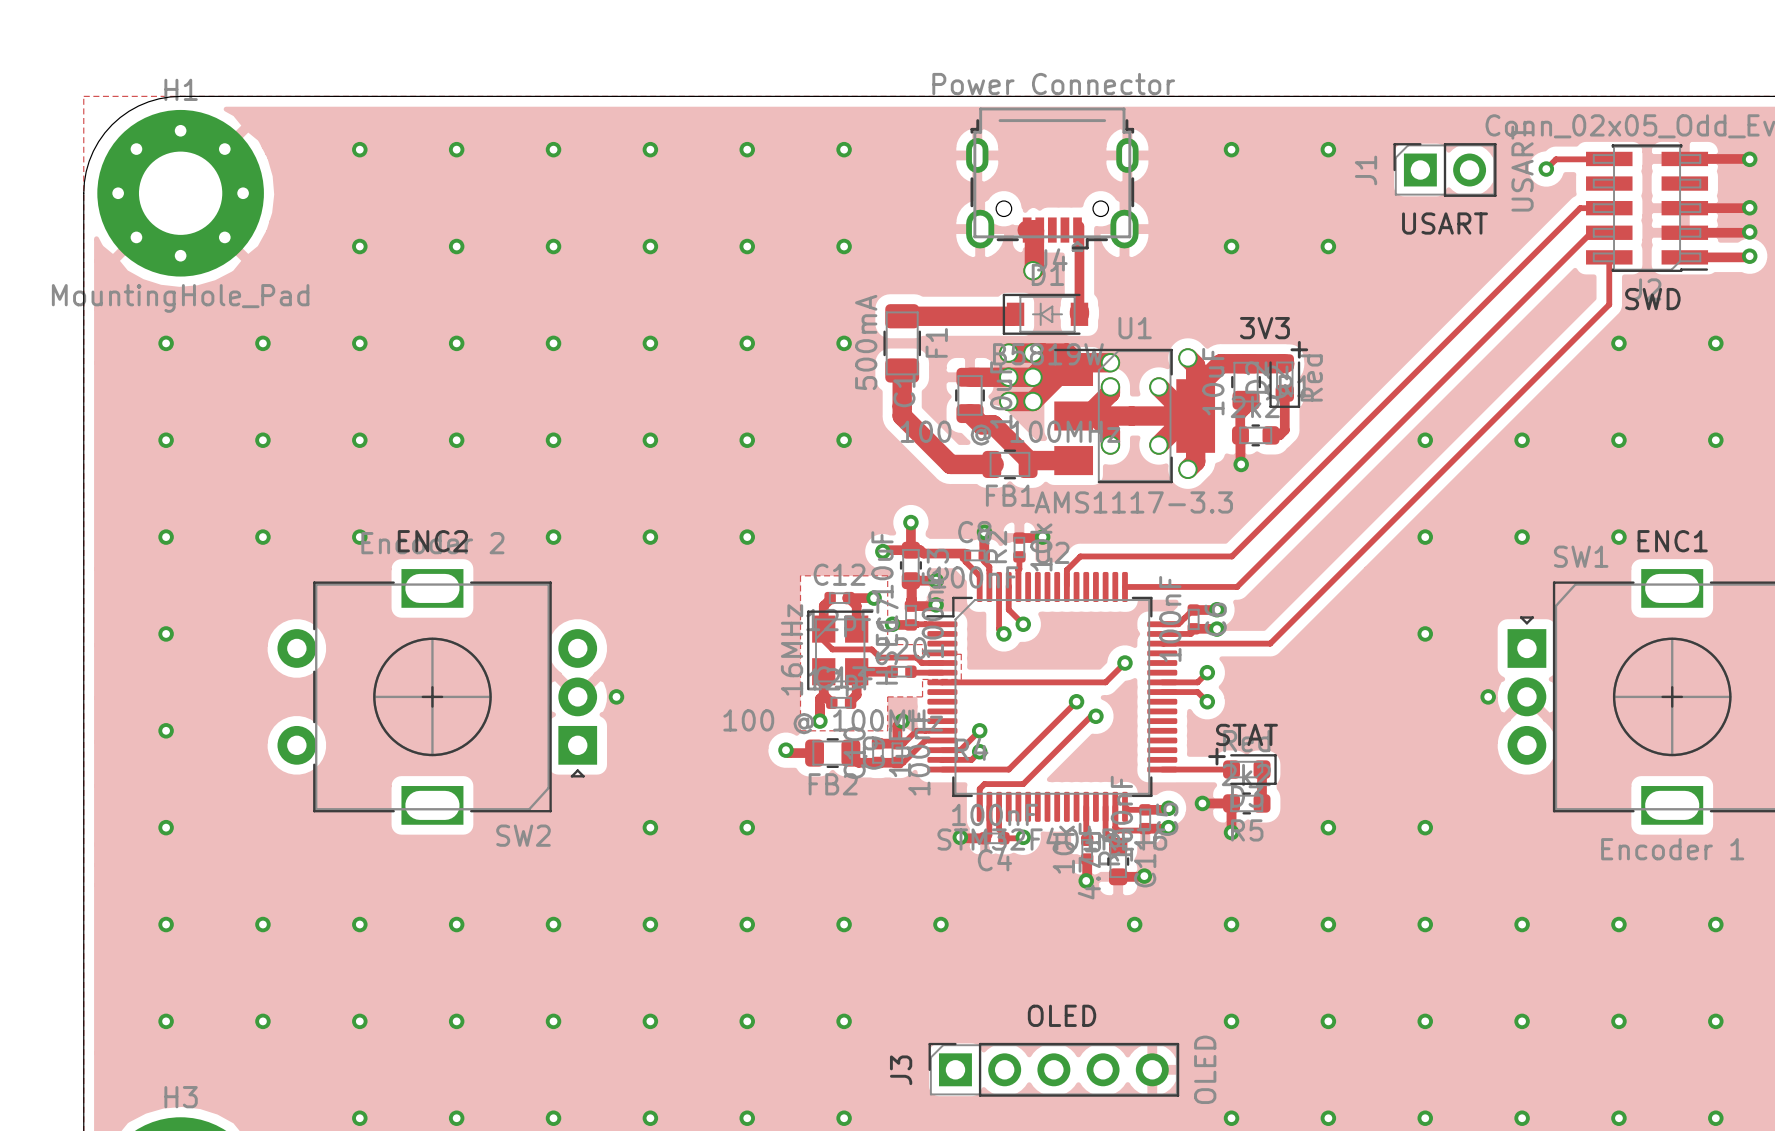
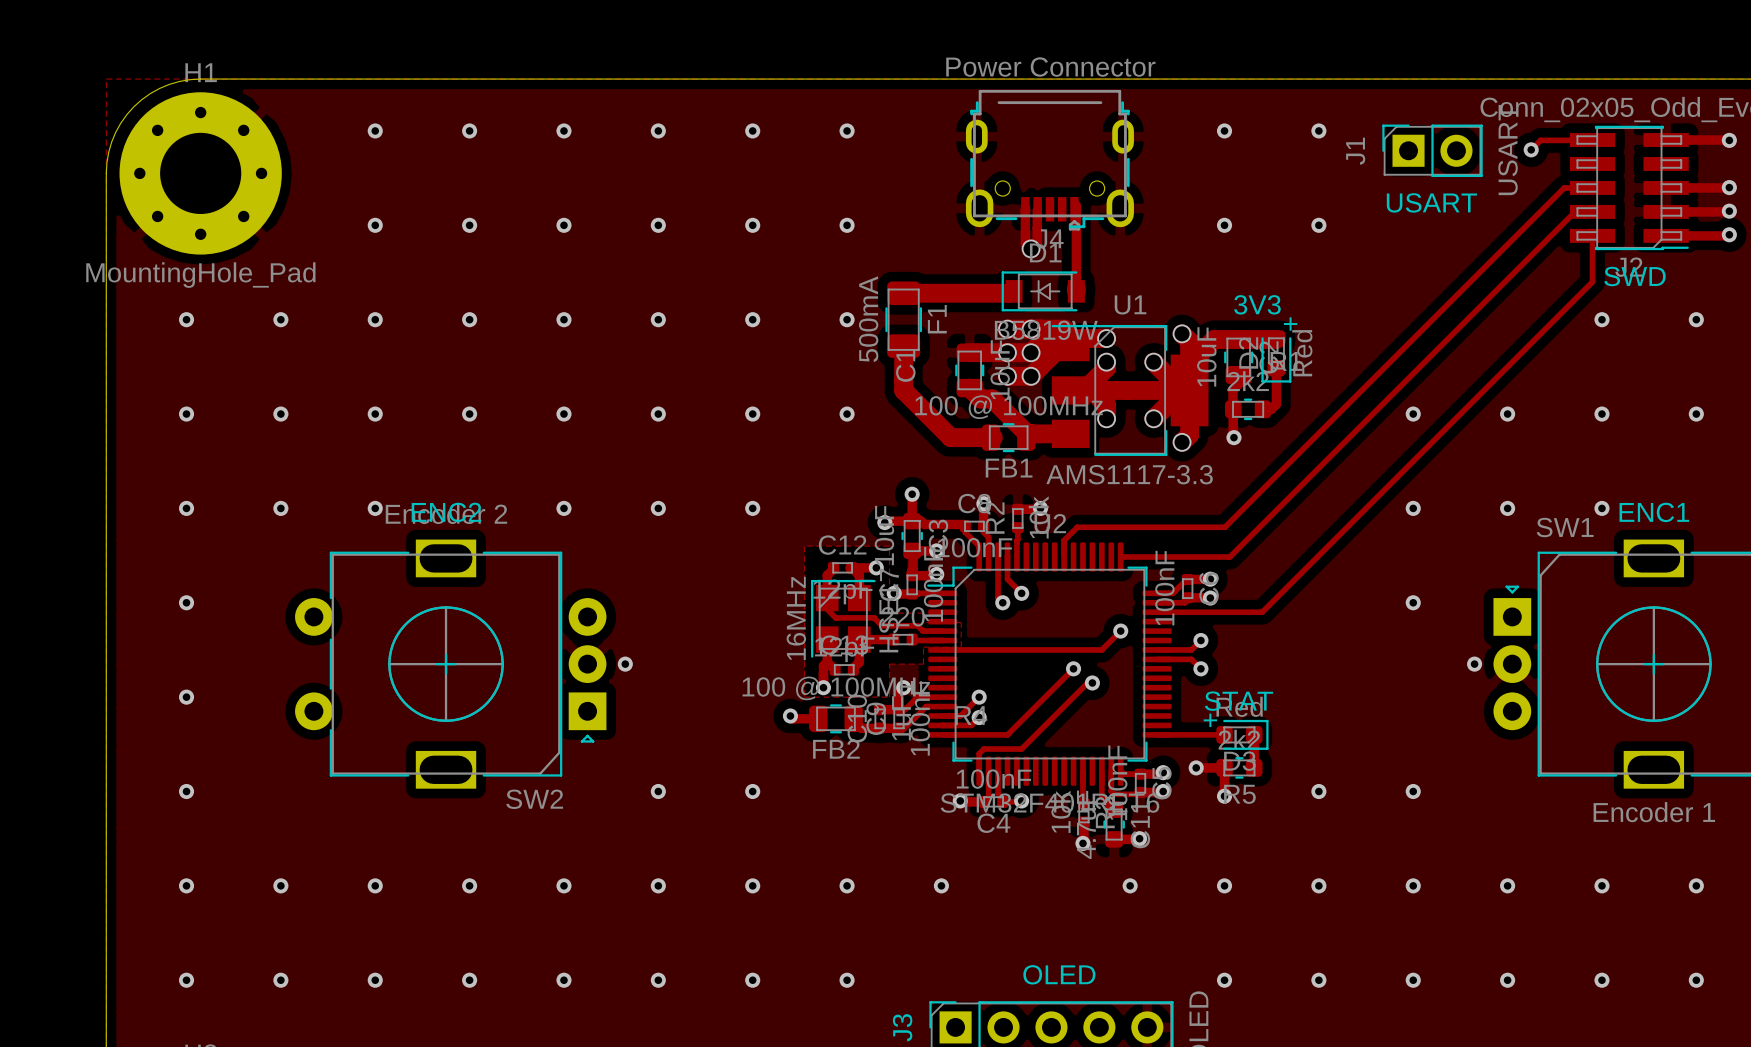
track: (1027, 230) (1034, 230) (1032, 270) -> none
track: none -> (1037, 210) (1037, 244) (1032, 249) (1025, 244) (1025, 214)

